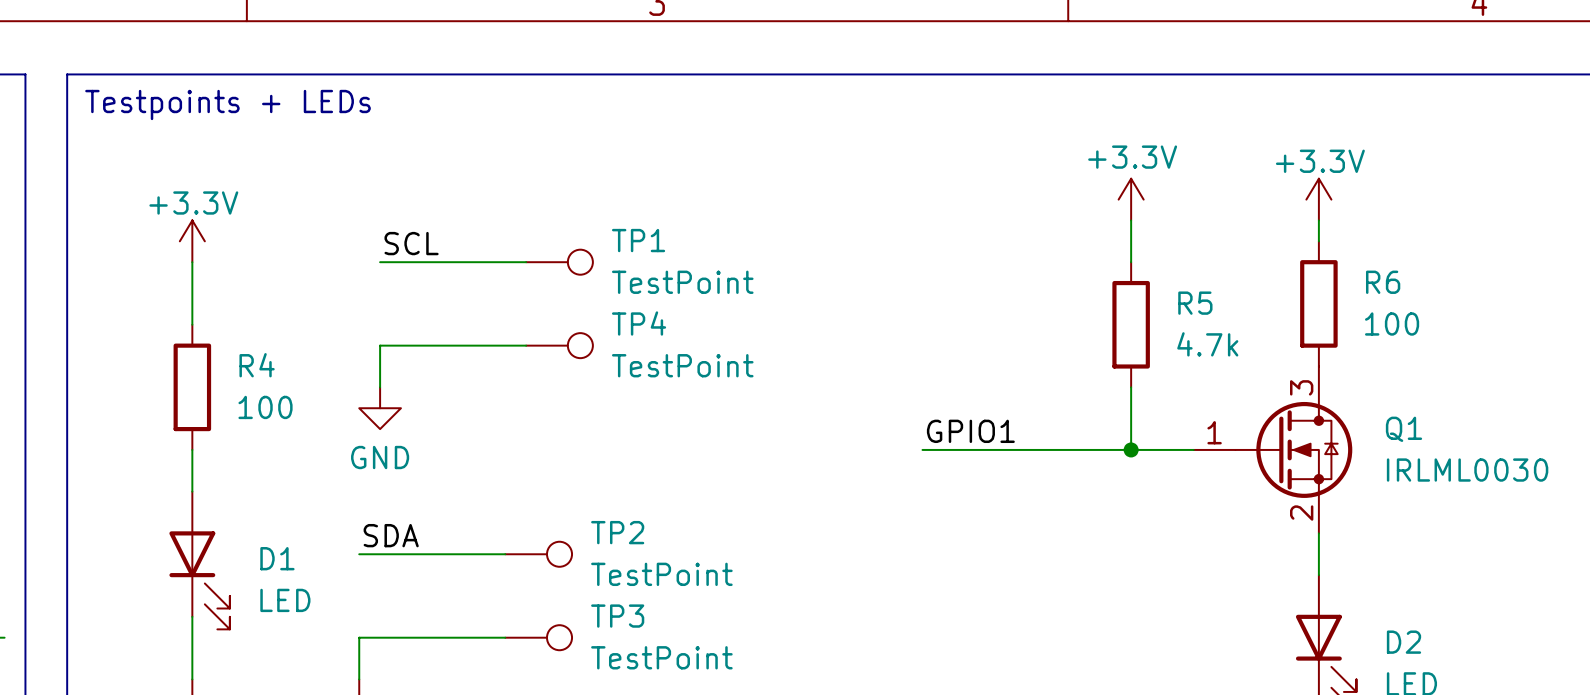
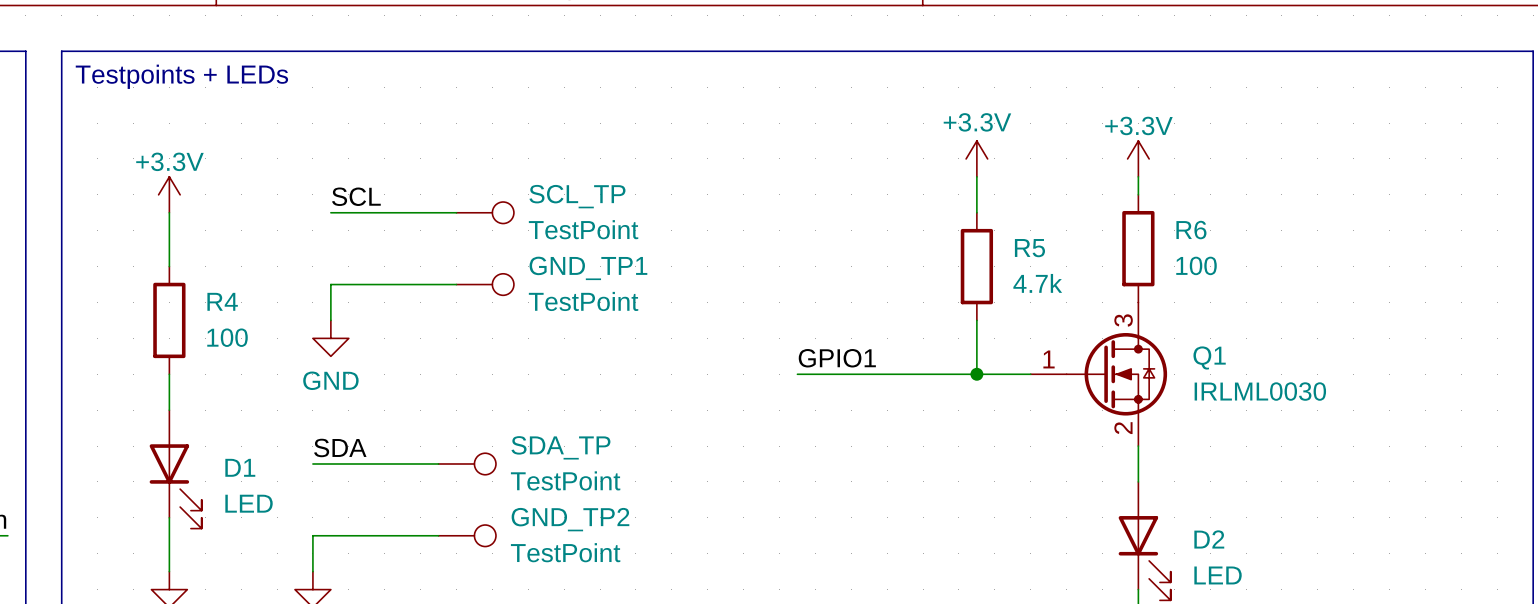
TP1 name: TP1 (638, 240) -> SCL_TP (577, 196)
TP4 name: TP4 (639, 323) -> GND_TP1 (588, 268)
TP2 name: TP2 (617, 532) -> SDA_TP (560, 447)
TP3 name: TP3 (617, 616) -> GND_TP2 (570, 519)

